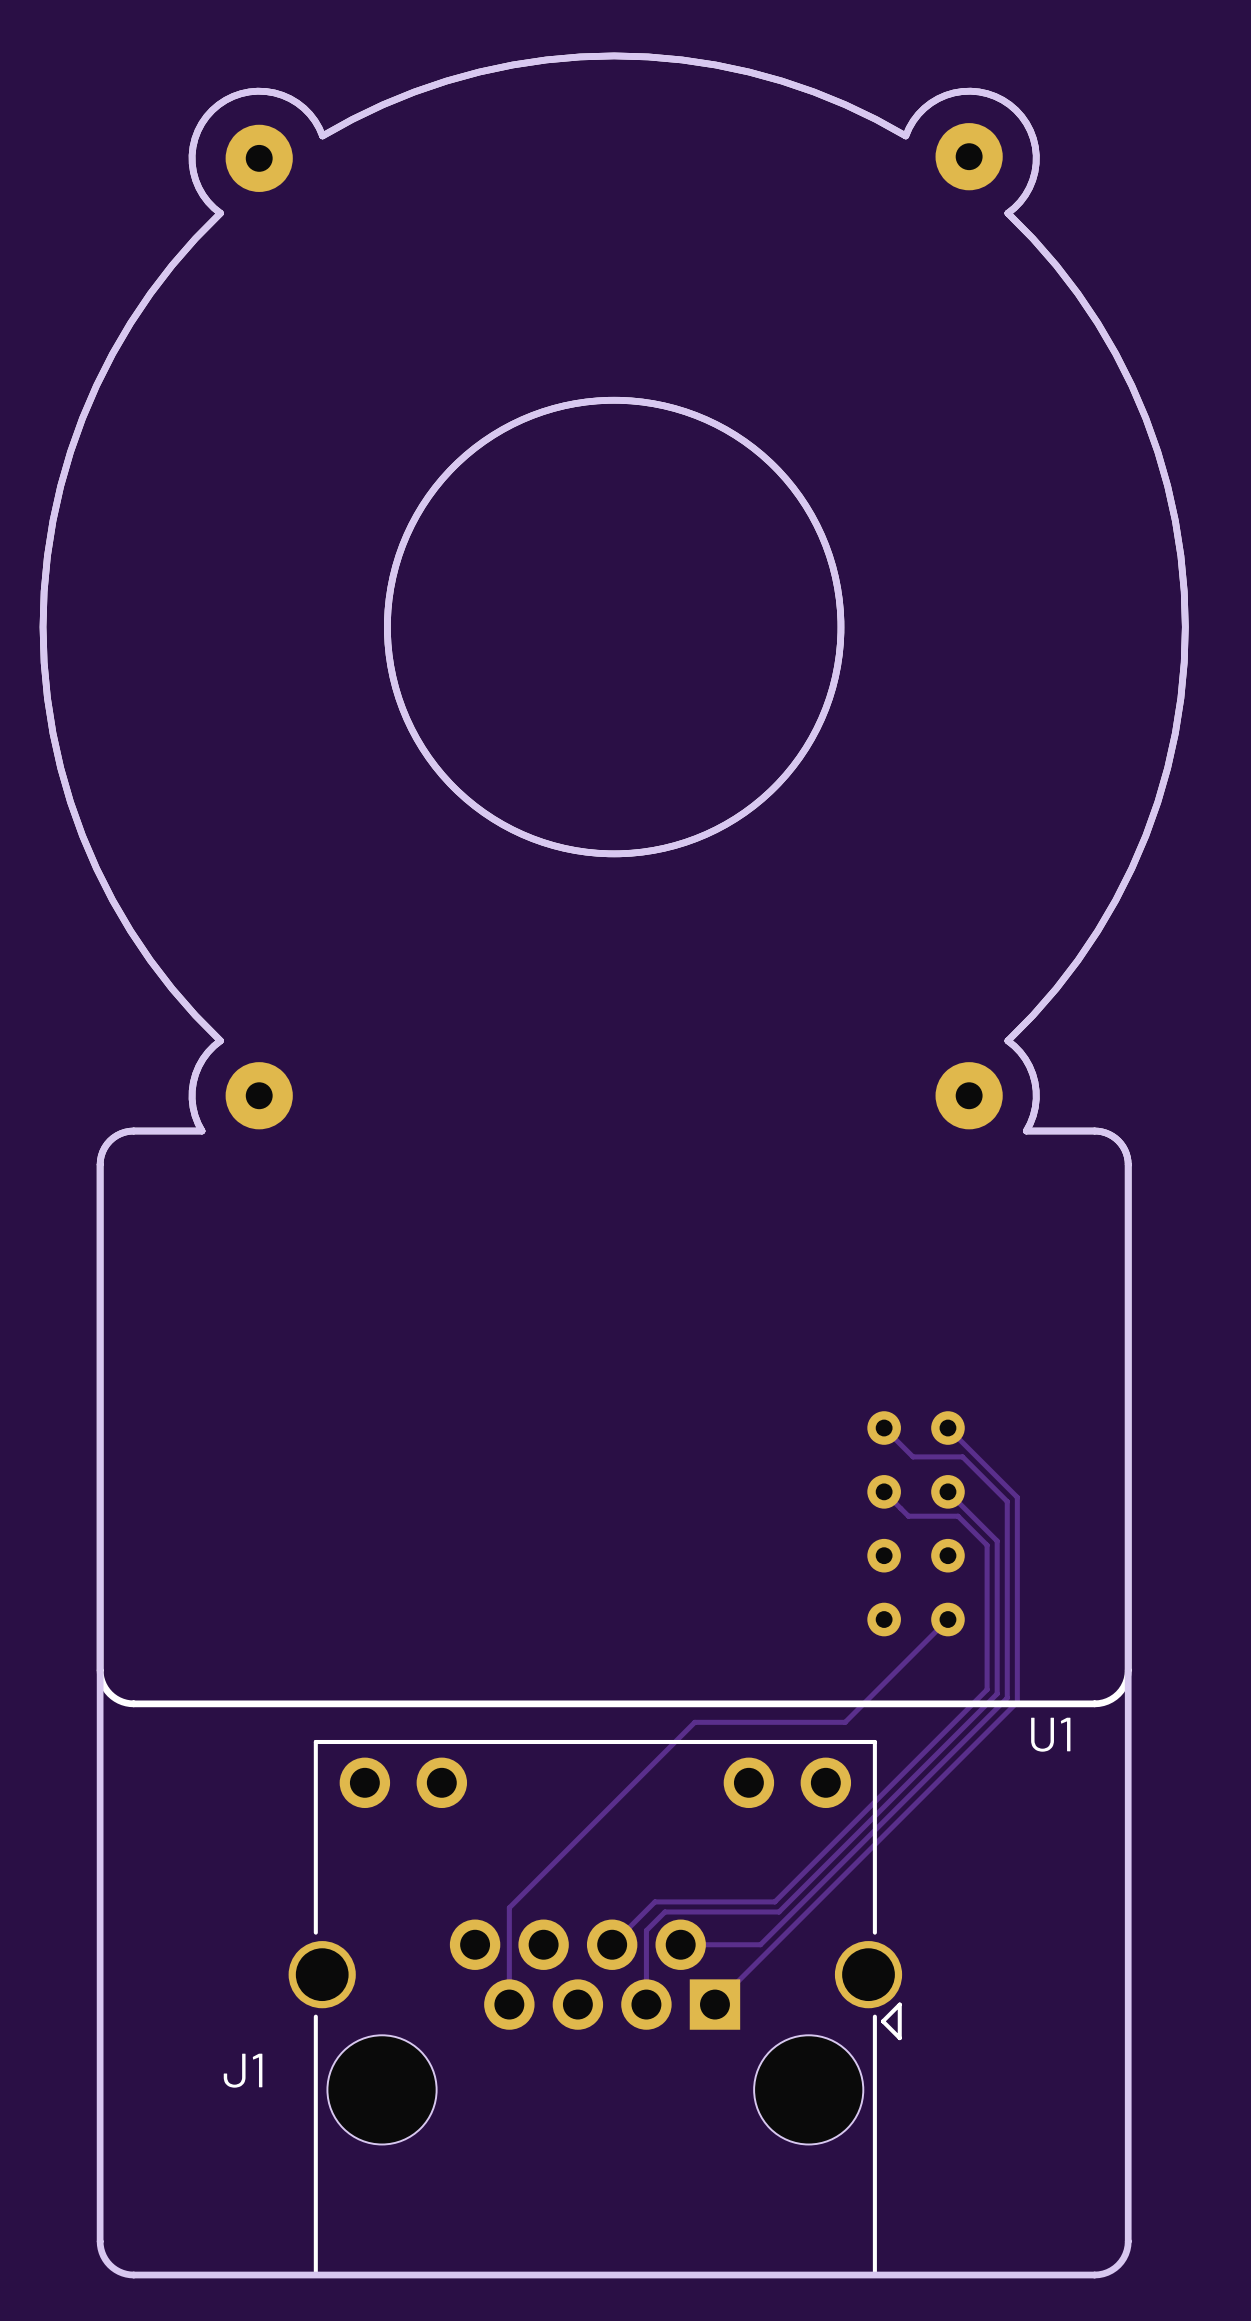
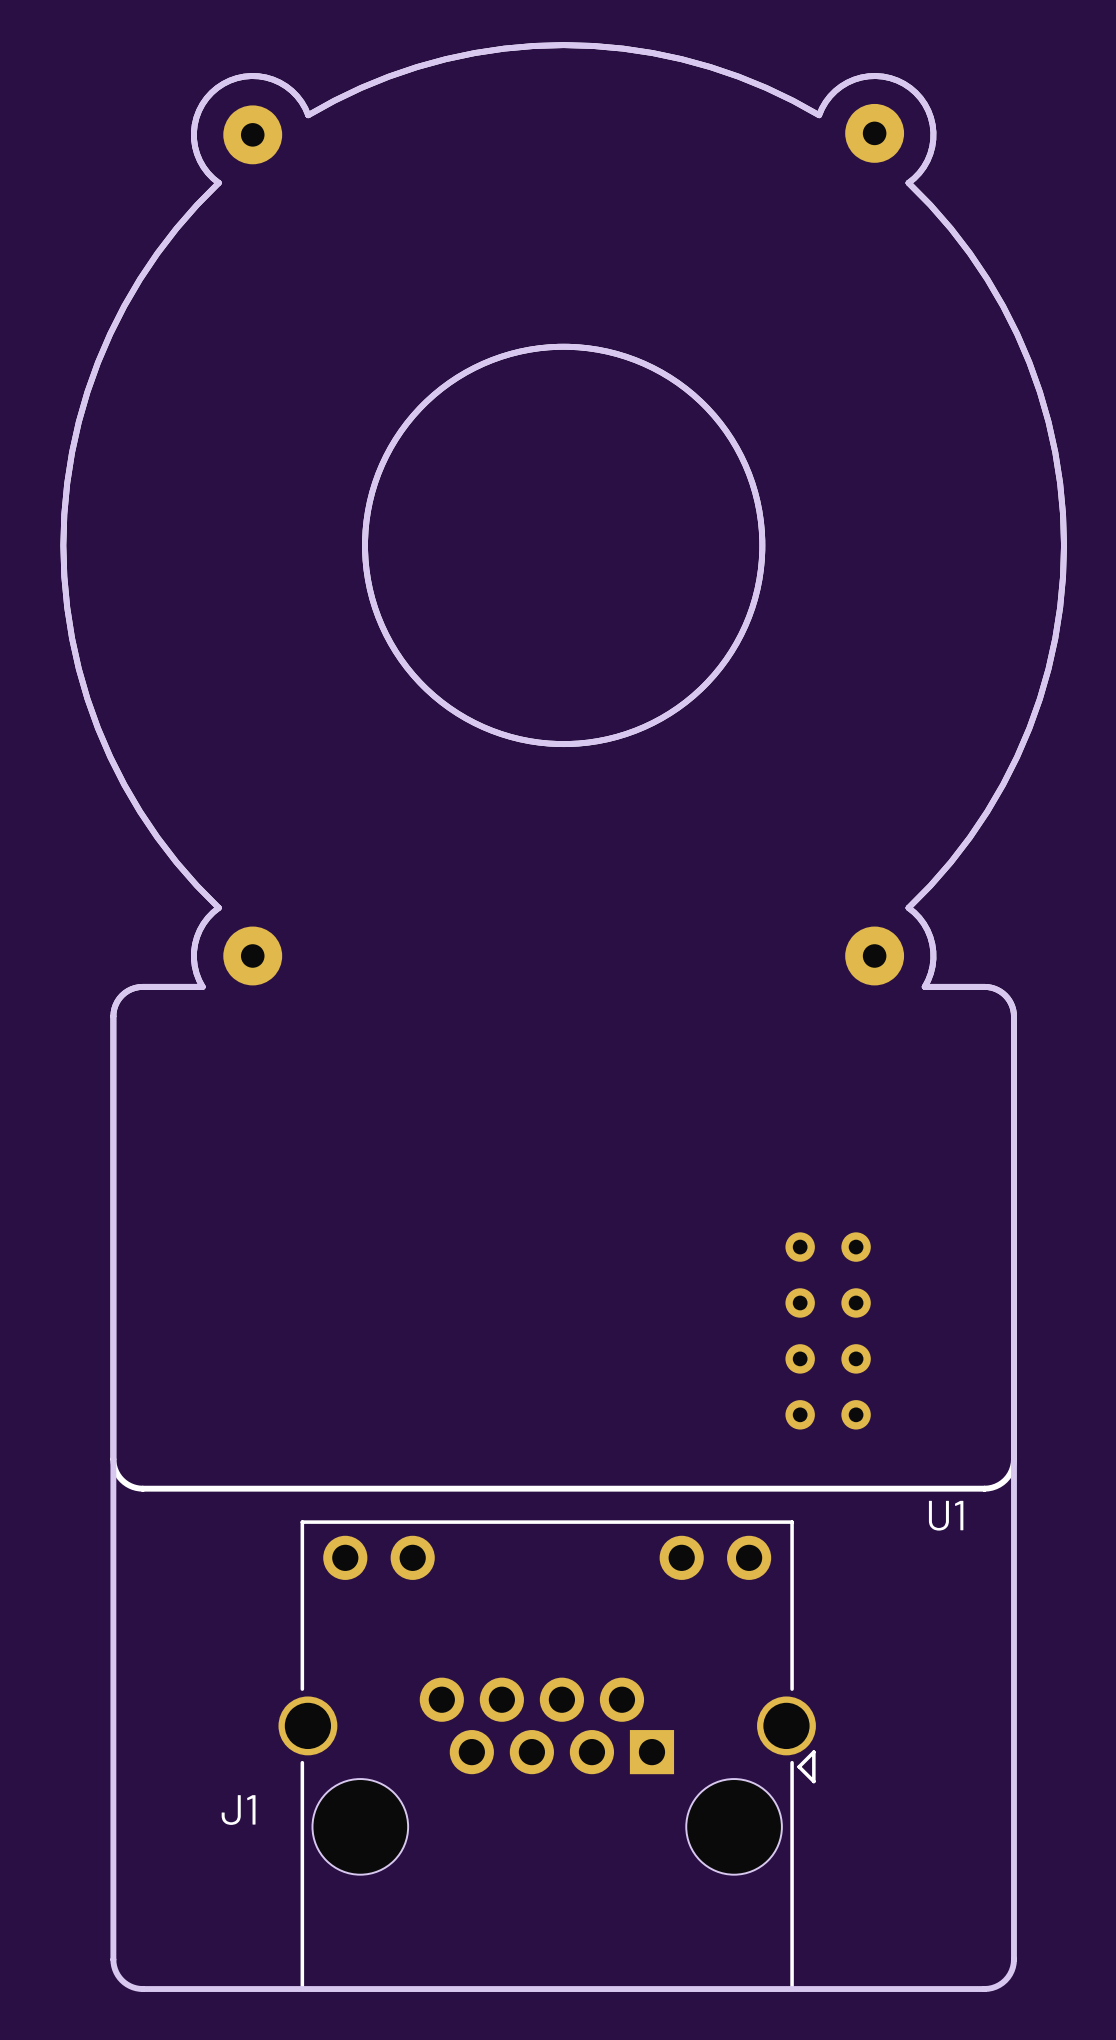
track: (884, 1428) (913, 1456) (962, 1456) (1007, 1501) (1007, 1698) (760, 1944) (680, 1944) -> none
track: (947, 1428) (1017, 1497) (1017, 1702) (714, 2004) -> none
track: (884, 1491) (908, 1516) (958, 1516) (987, 1545) (987, 1689) (774, 1901) (655, 1901) (612, 1944) -> none
track: (947, 1491) (997, 1541) (997, 1693) (779, 1911) (664, 1911) (646, 1930) (646, 2004) -> none
track: (947, 1619) (845, 1722) (694, 1722) (509, 1907) (509, 2004) -> none

